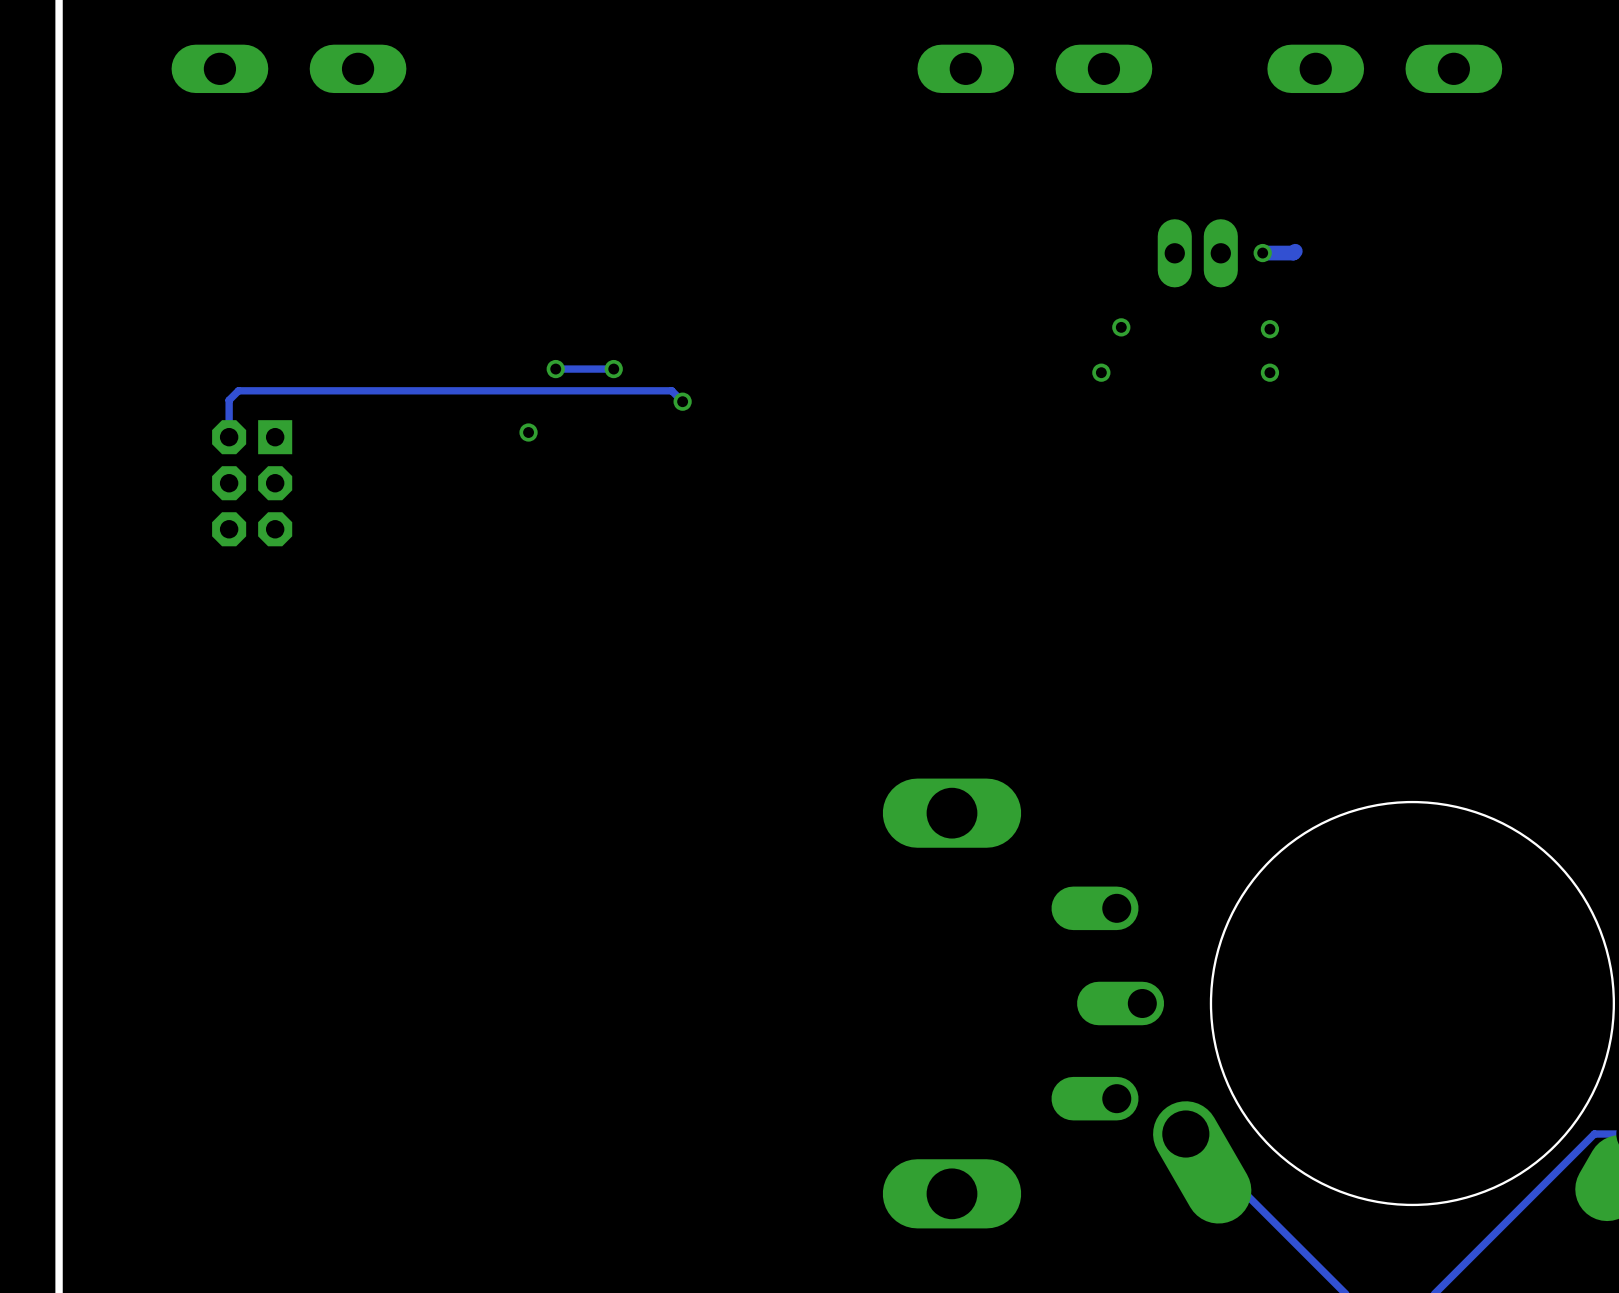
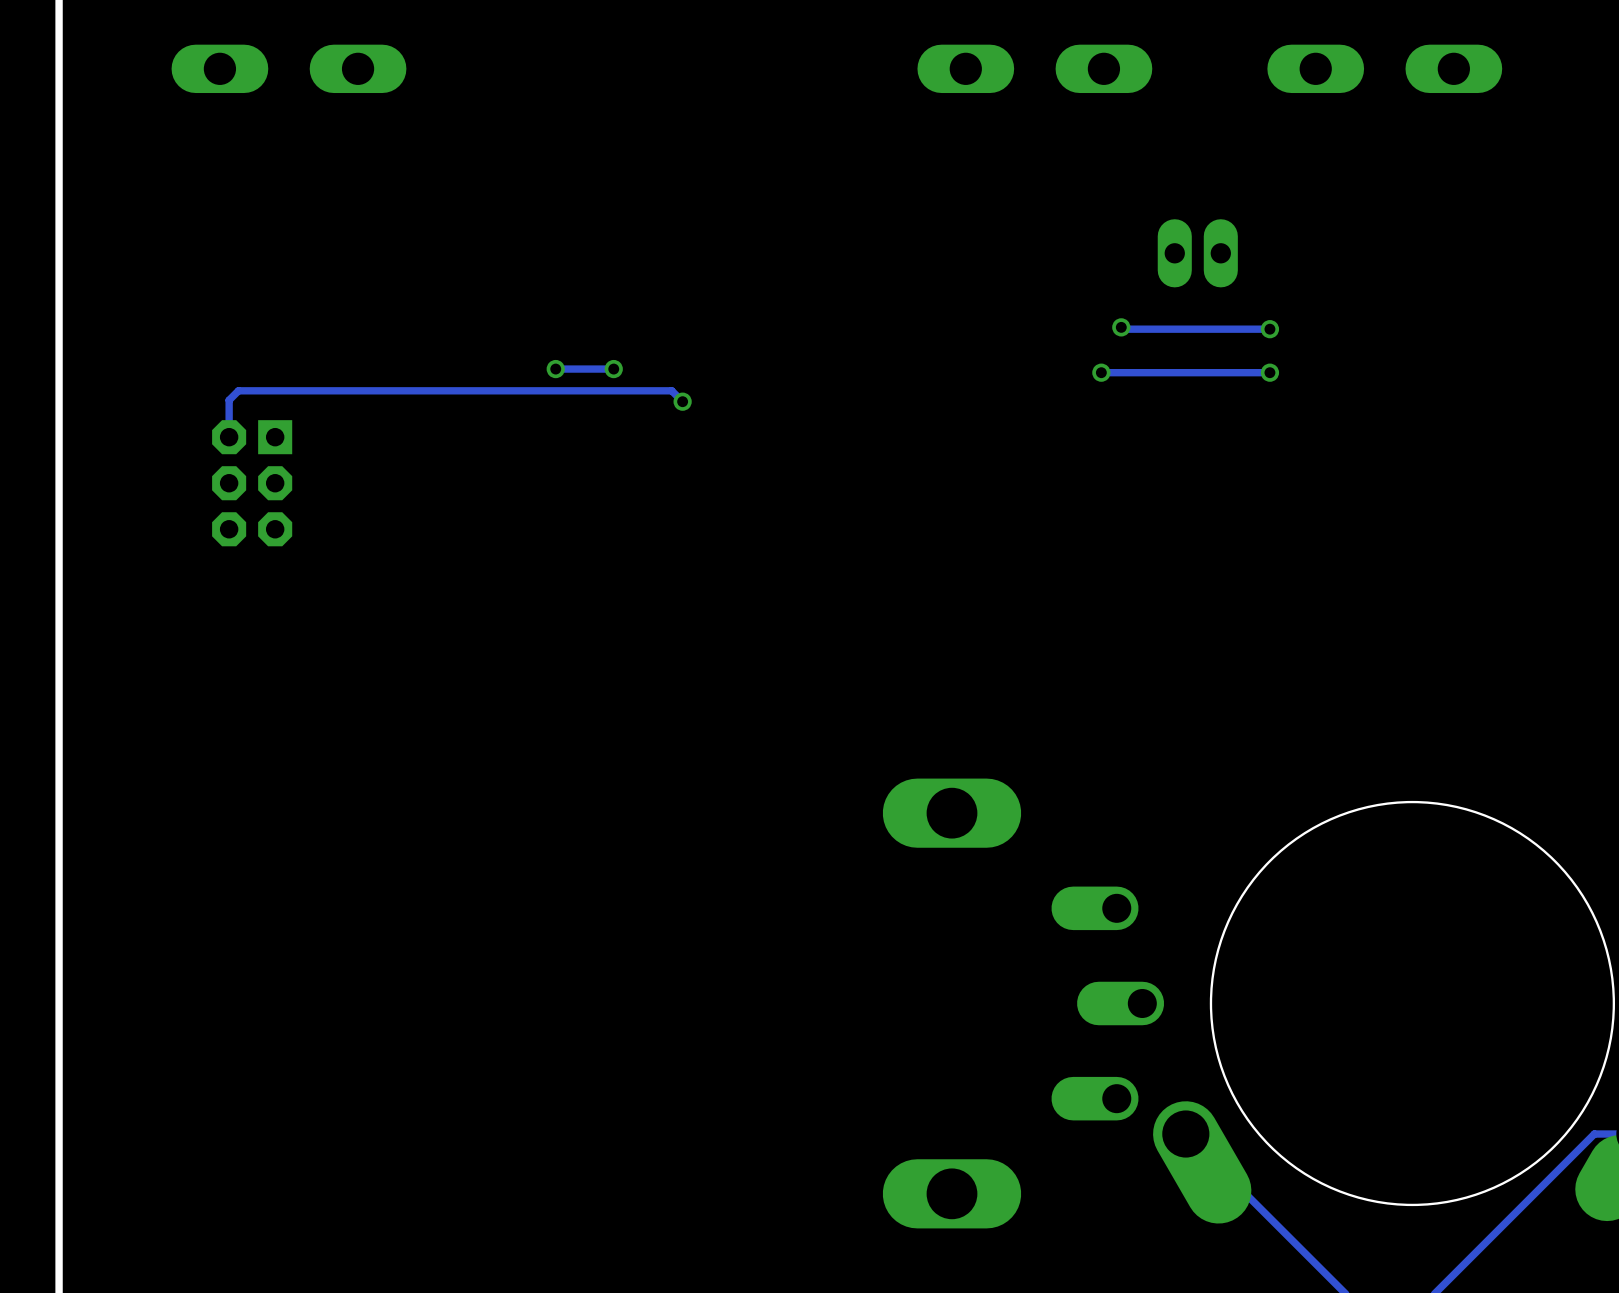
track: (1295, 251) (1293, 253) (1262, 253) -> none
via: (1262, 253) -> none
track: none -> (1269, 329) (1123, 329)
track: none -> (1269, 372) (1101, 372)
via: (528, 432) -> none

